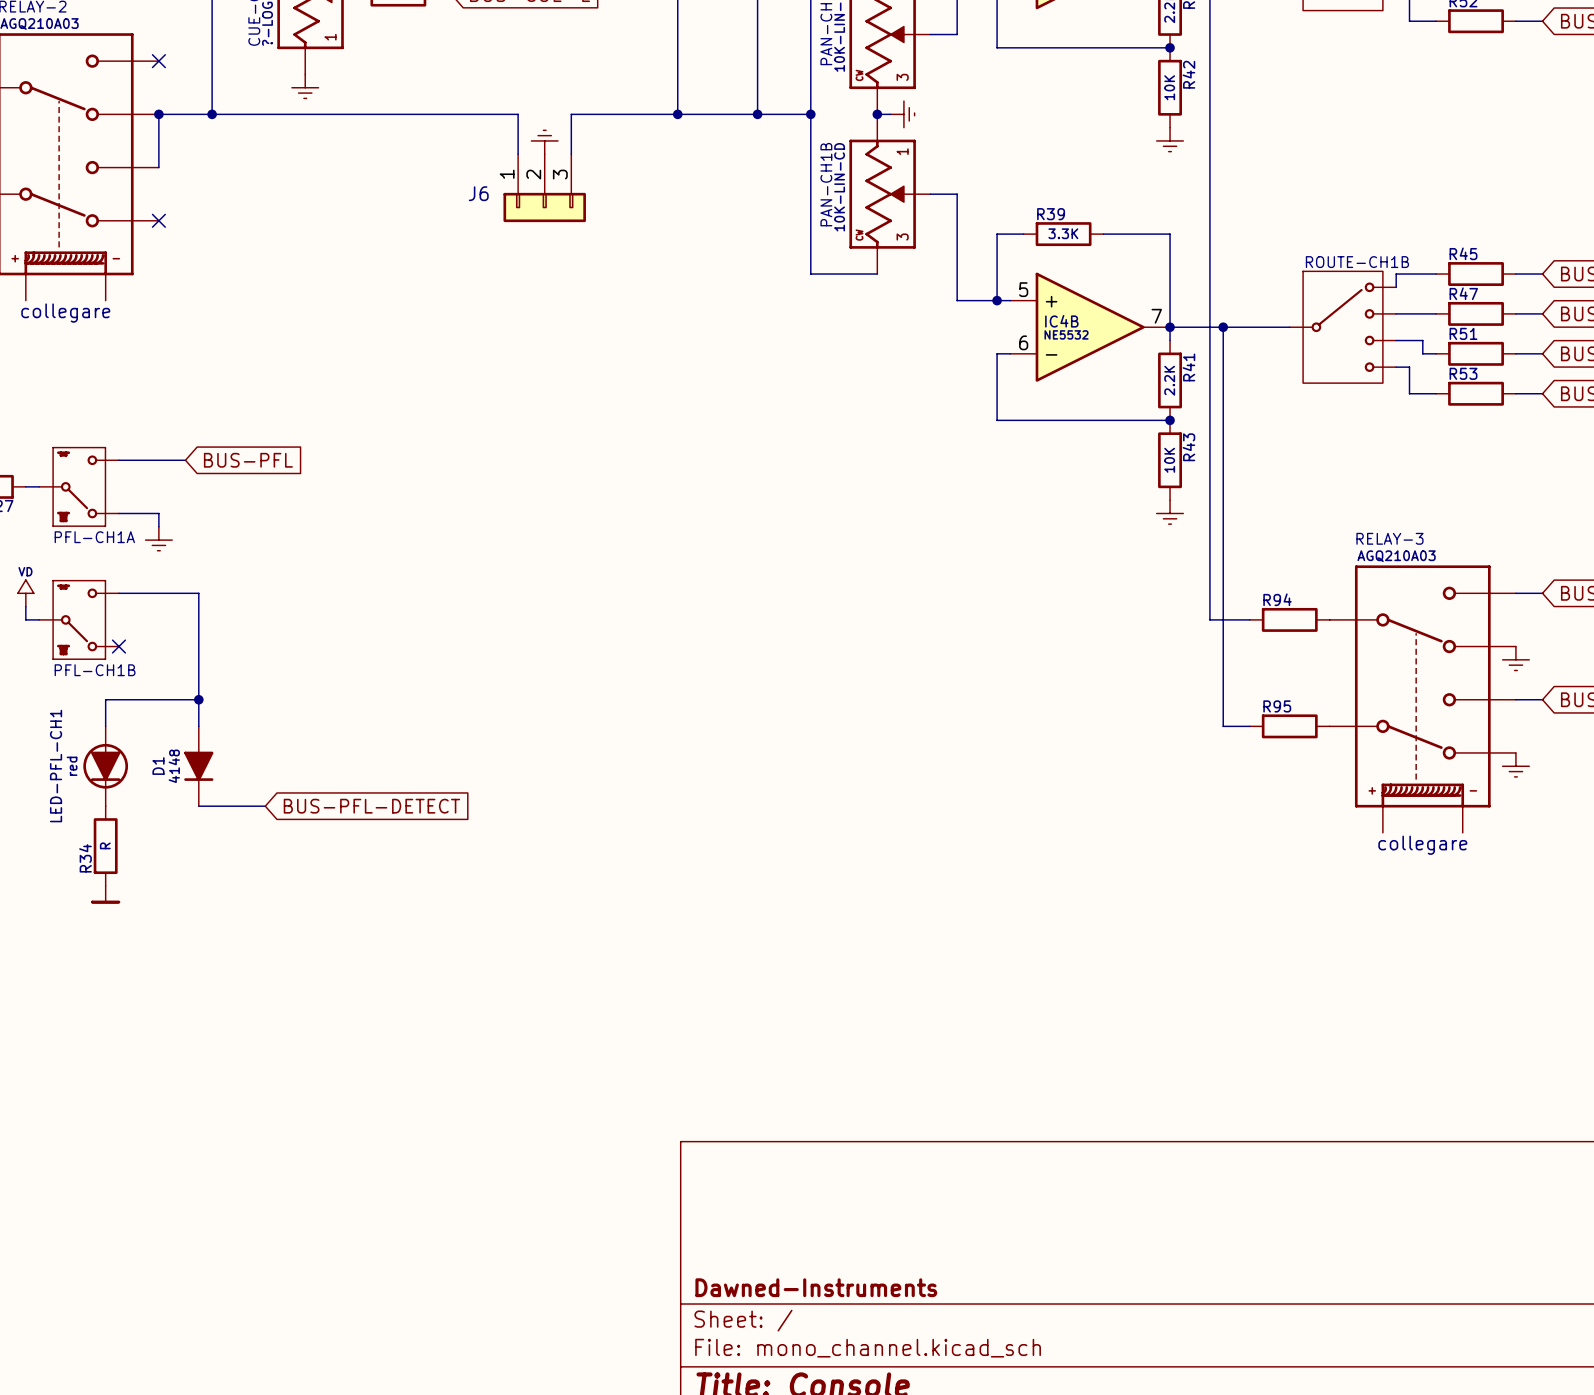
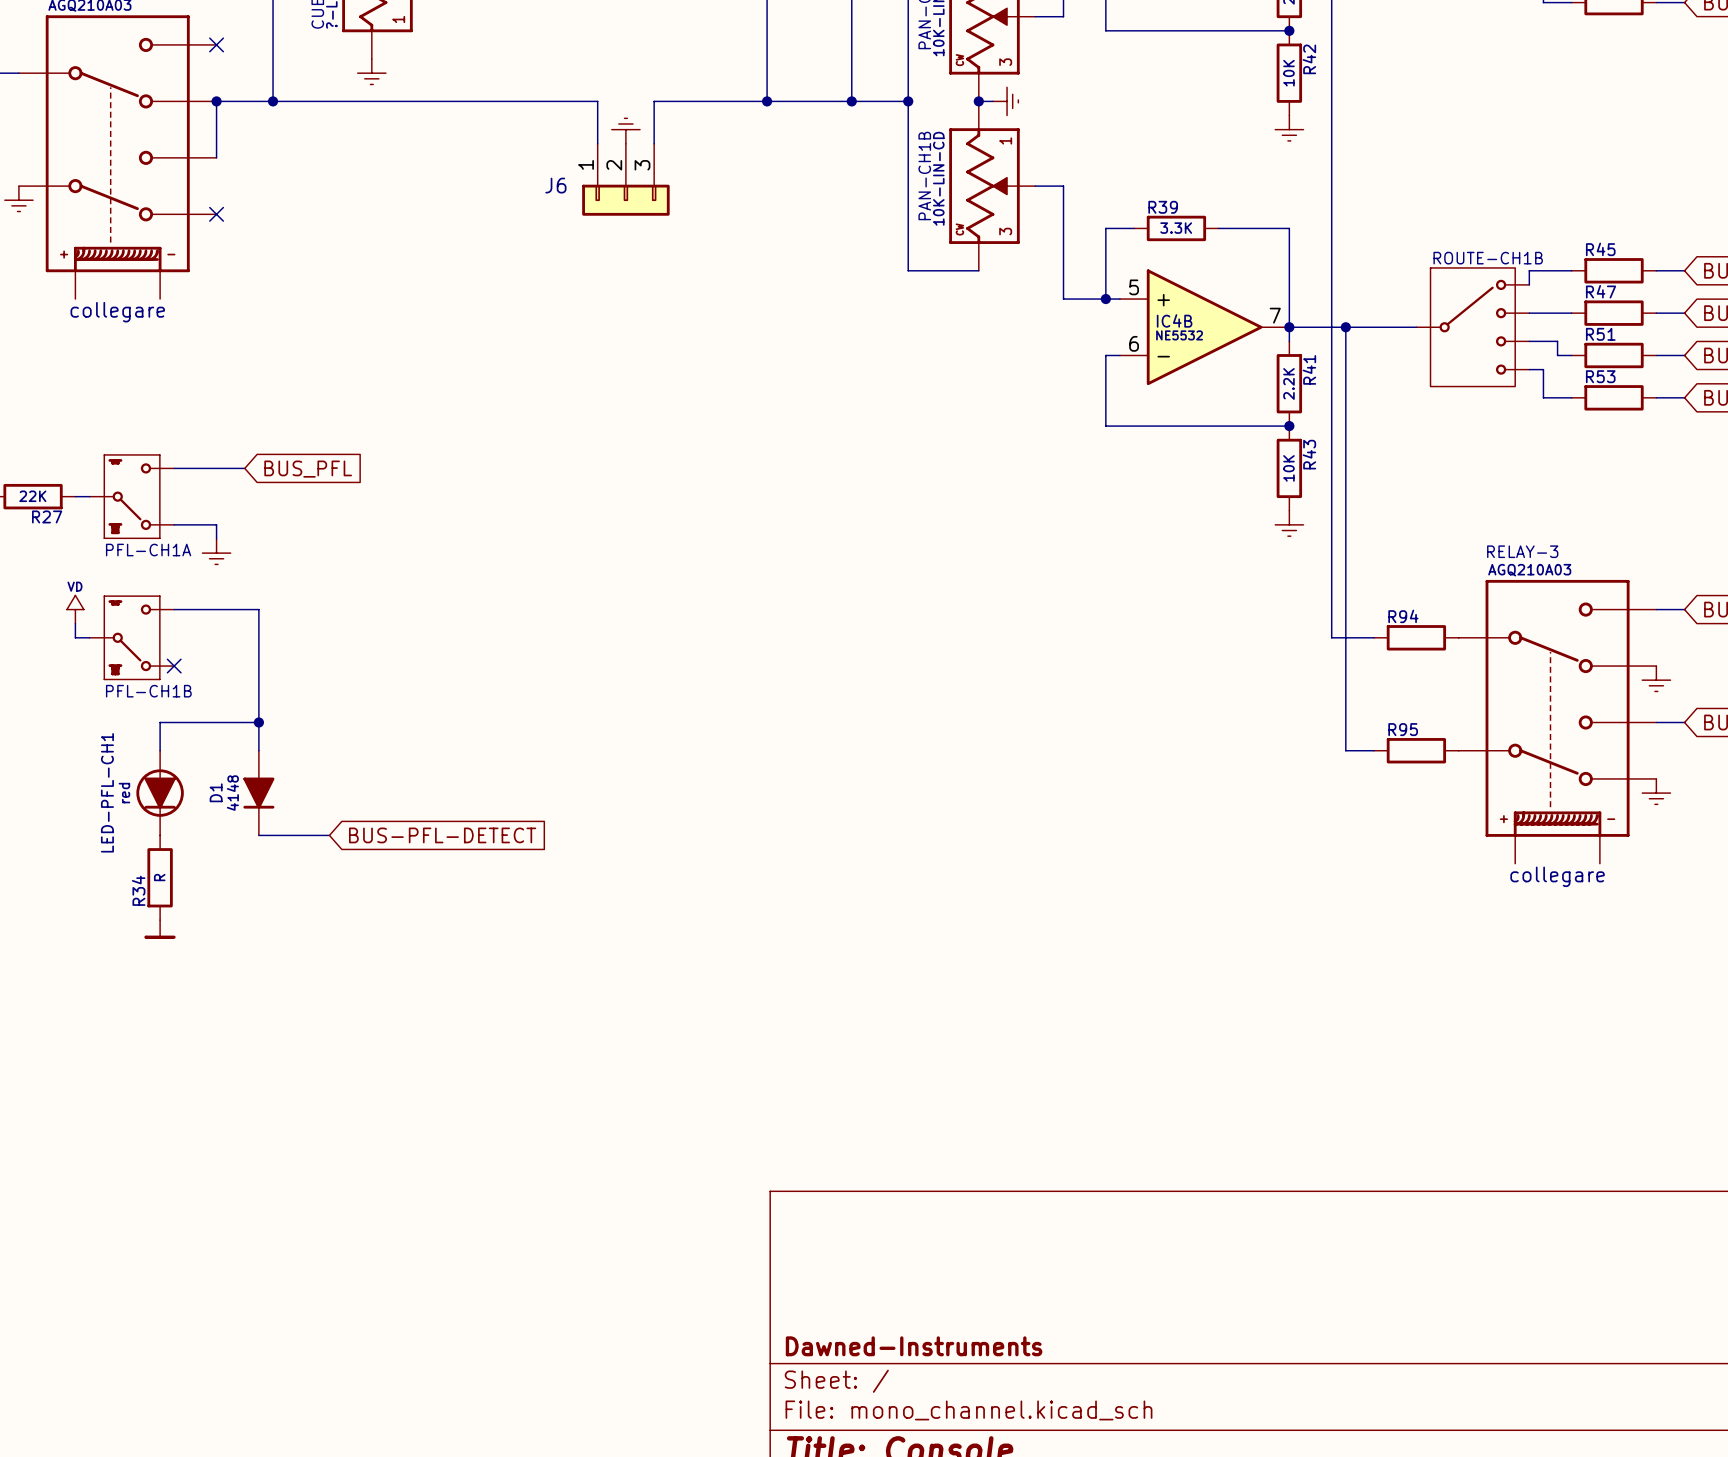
global label: BUS-PFL (248, 460) -> BUS_PFL (308, 469)

